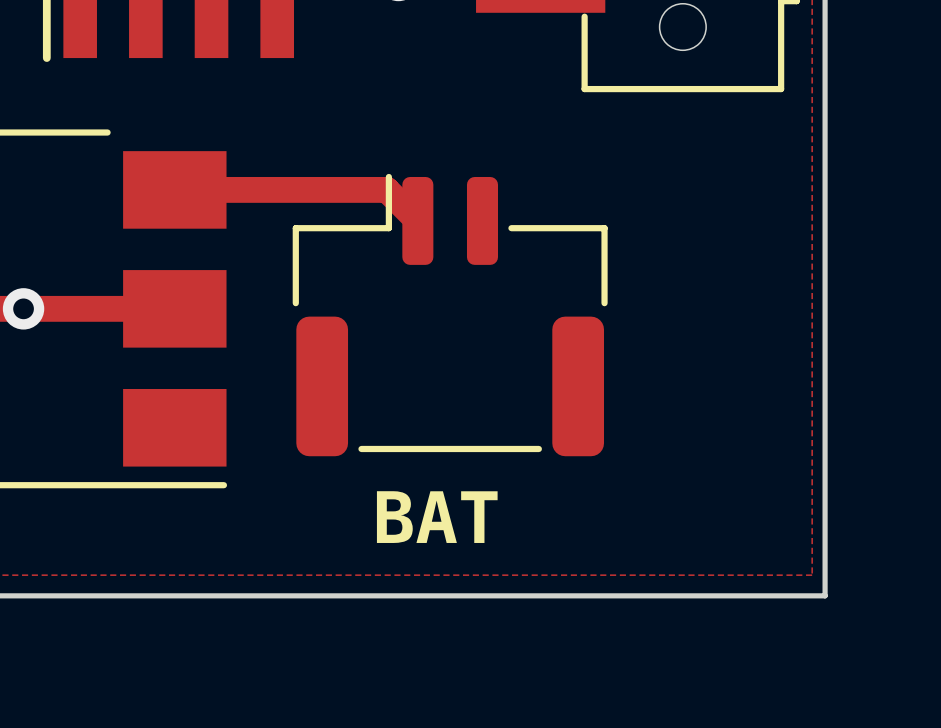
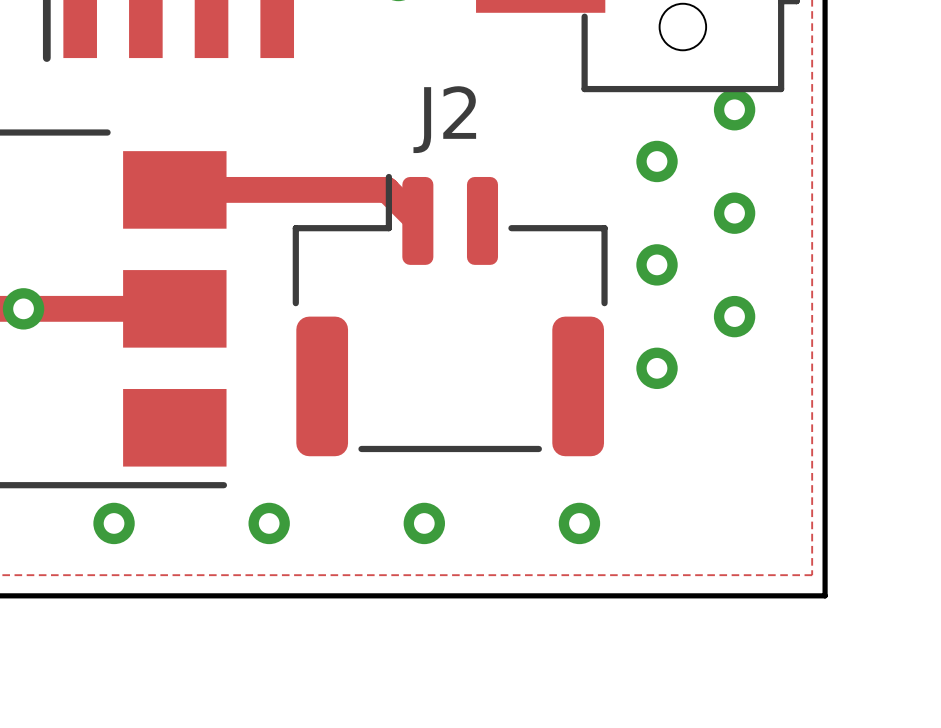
via: none -> (734, 109)
J2 name: none -> J2 (444, 119)
via: none -> (657, 161)
via: none -> (734, 213)
via: none -> (657, 264)
via: none -> (734, 316)
via: none -> (657, 368)
text: BAT (437, 517) -> none
via: none -> (114, 523)
via: none -> (269, 523)
via: none -> (424, 523)
via: none -> (579, 523)

